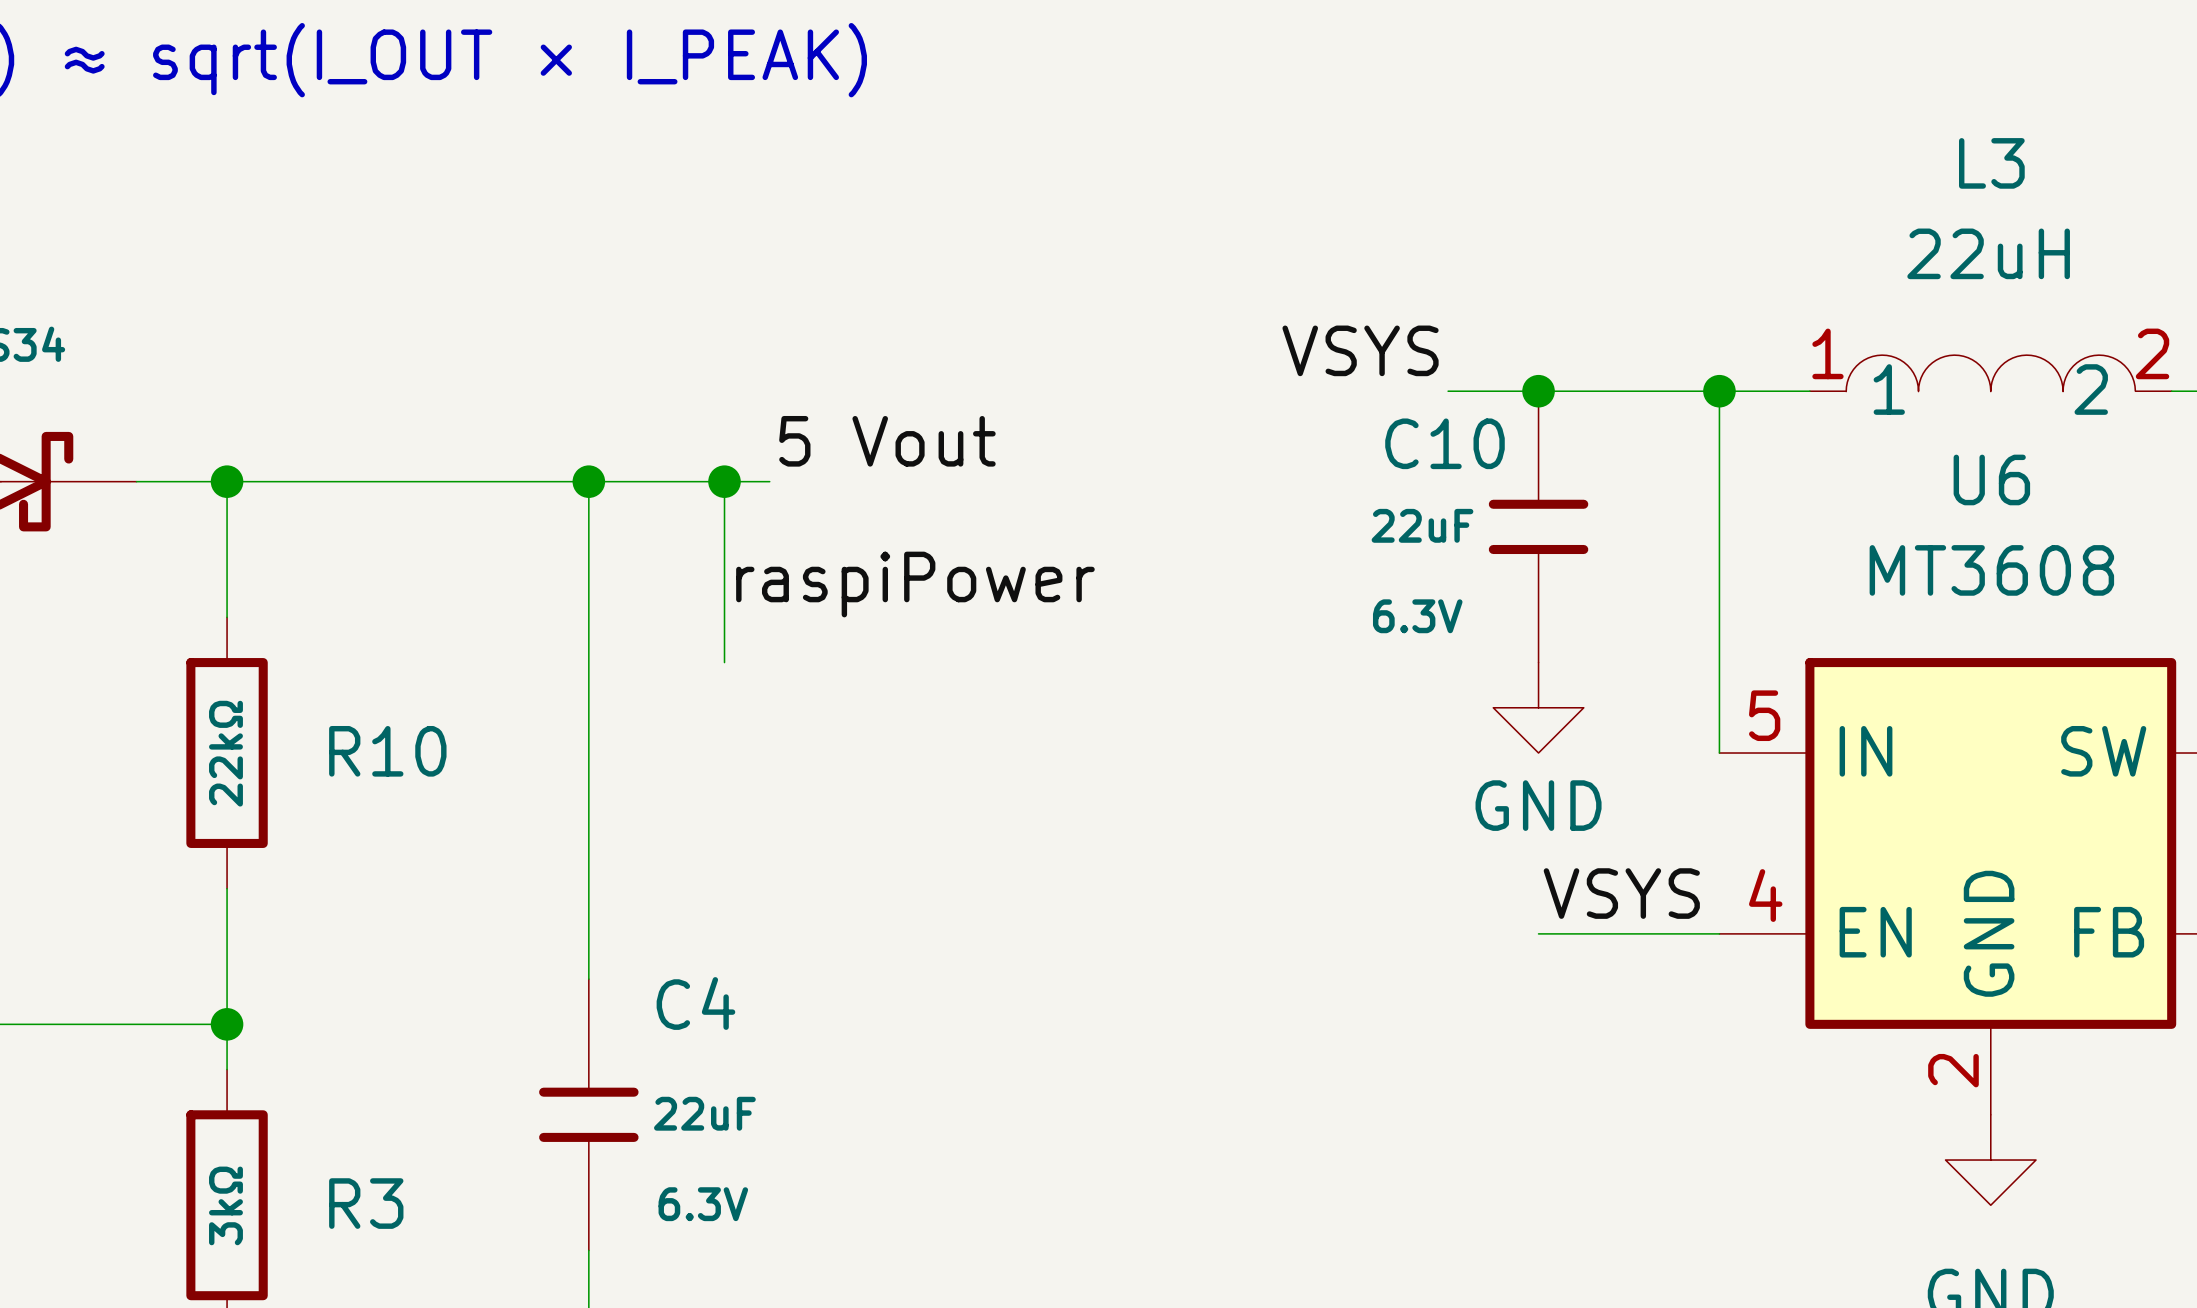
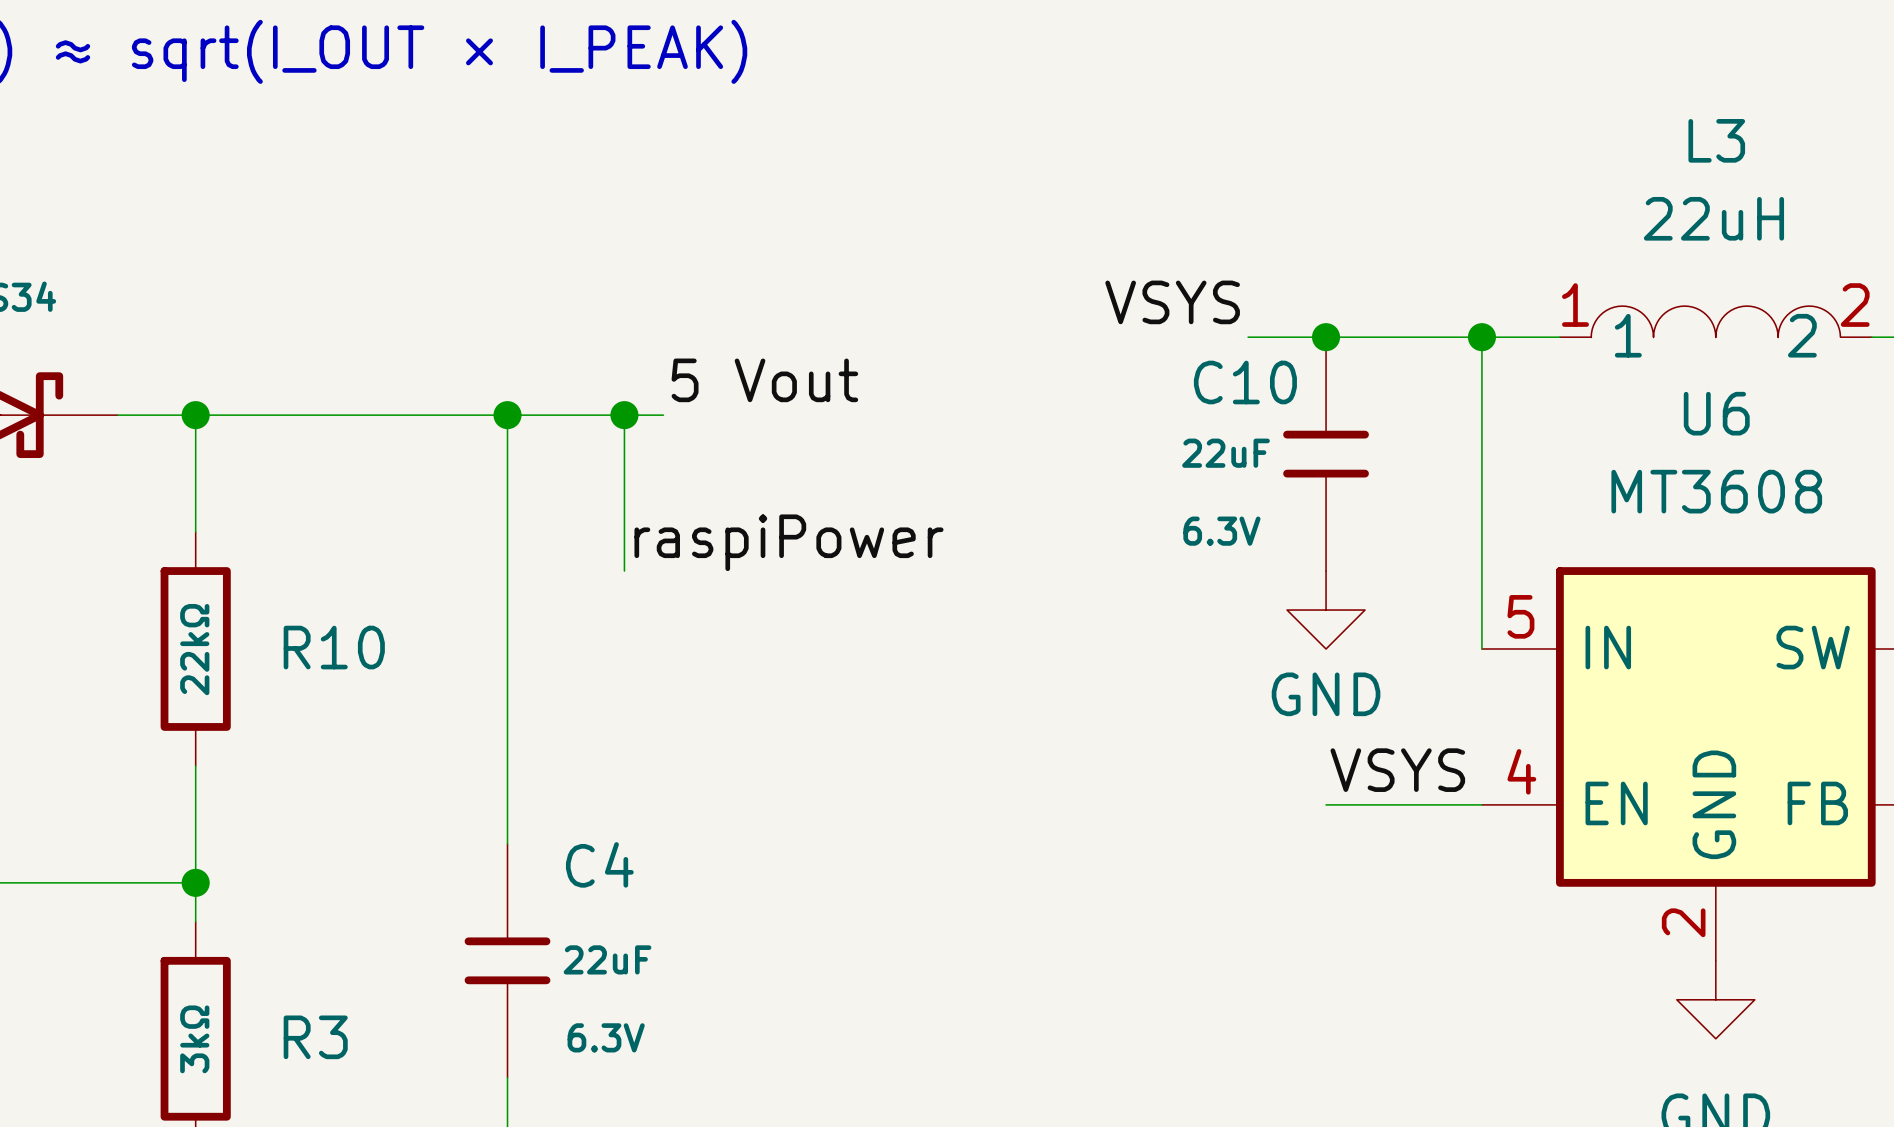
label position: raspiPower (915, 584) -> raspiPower (789, 542)

